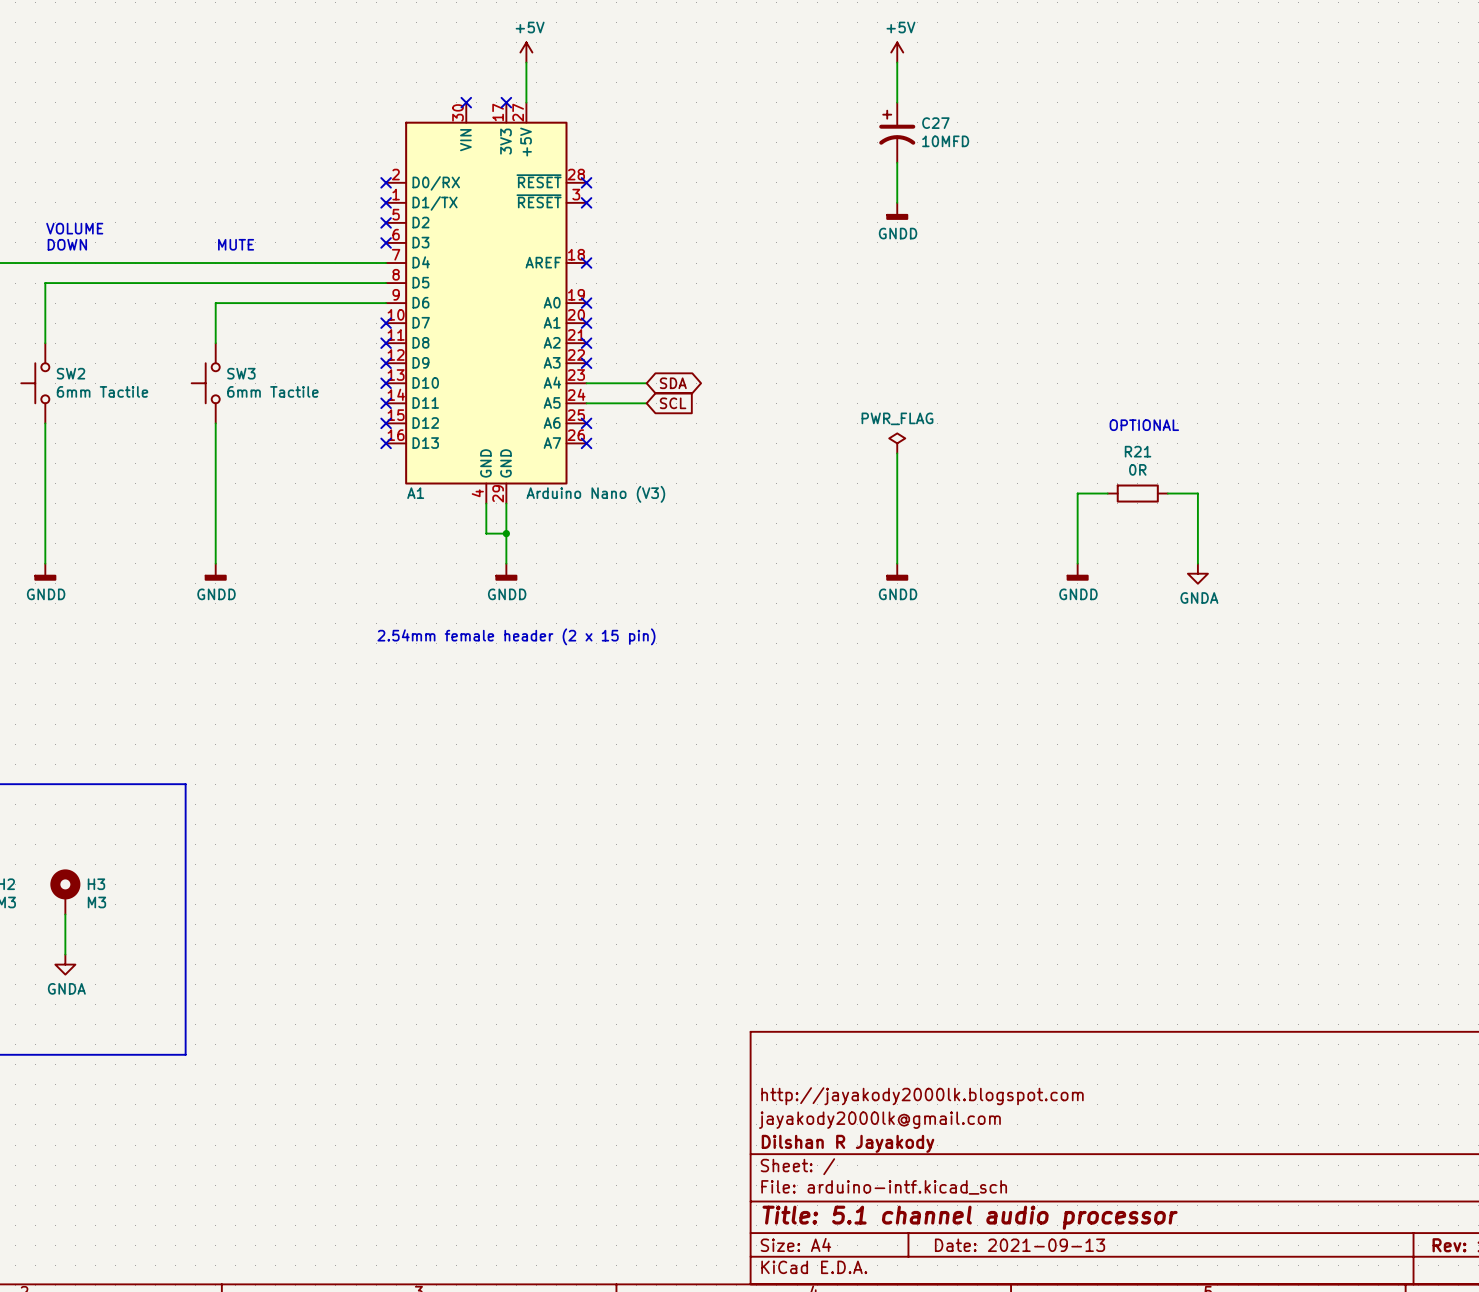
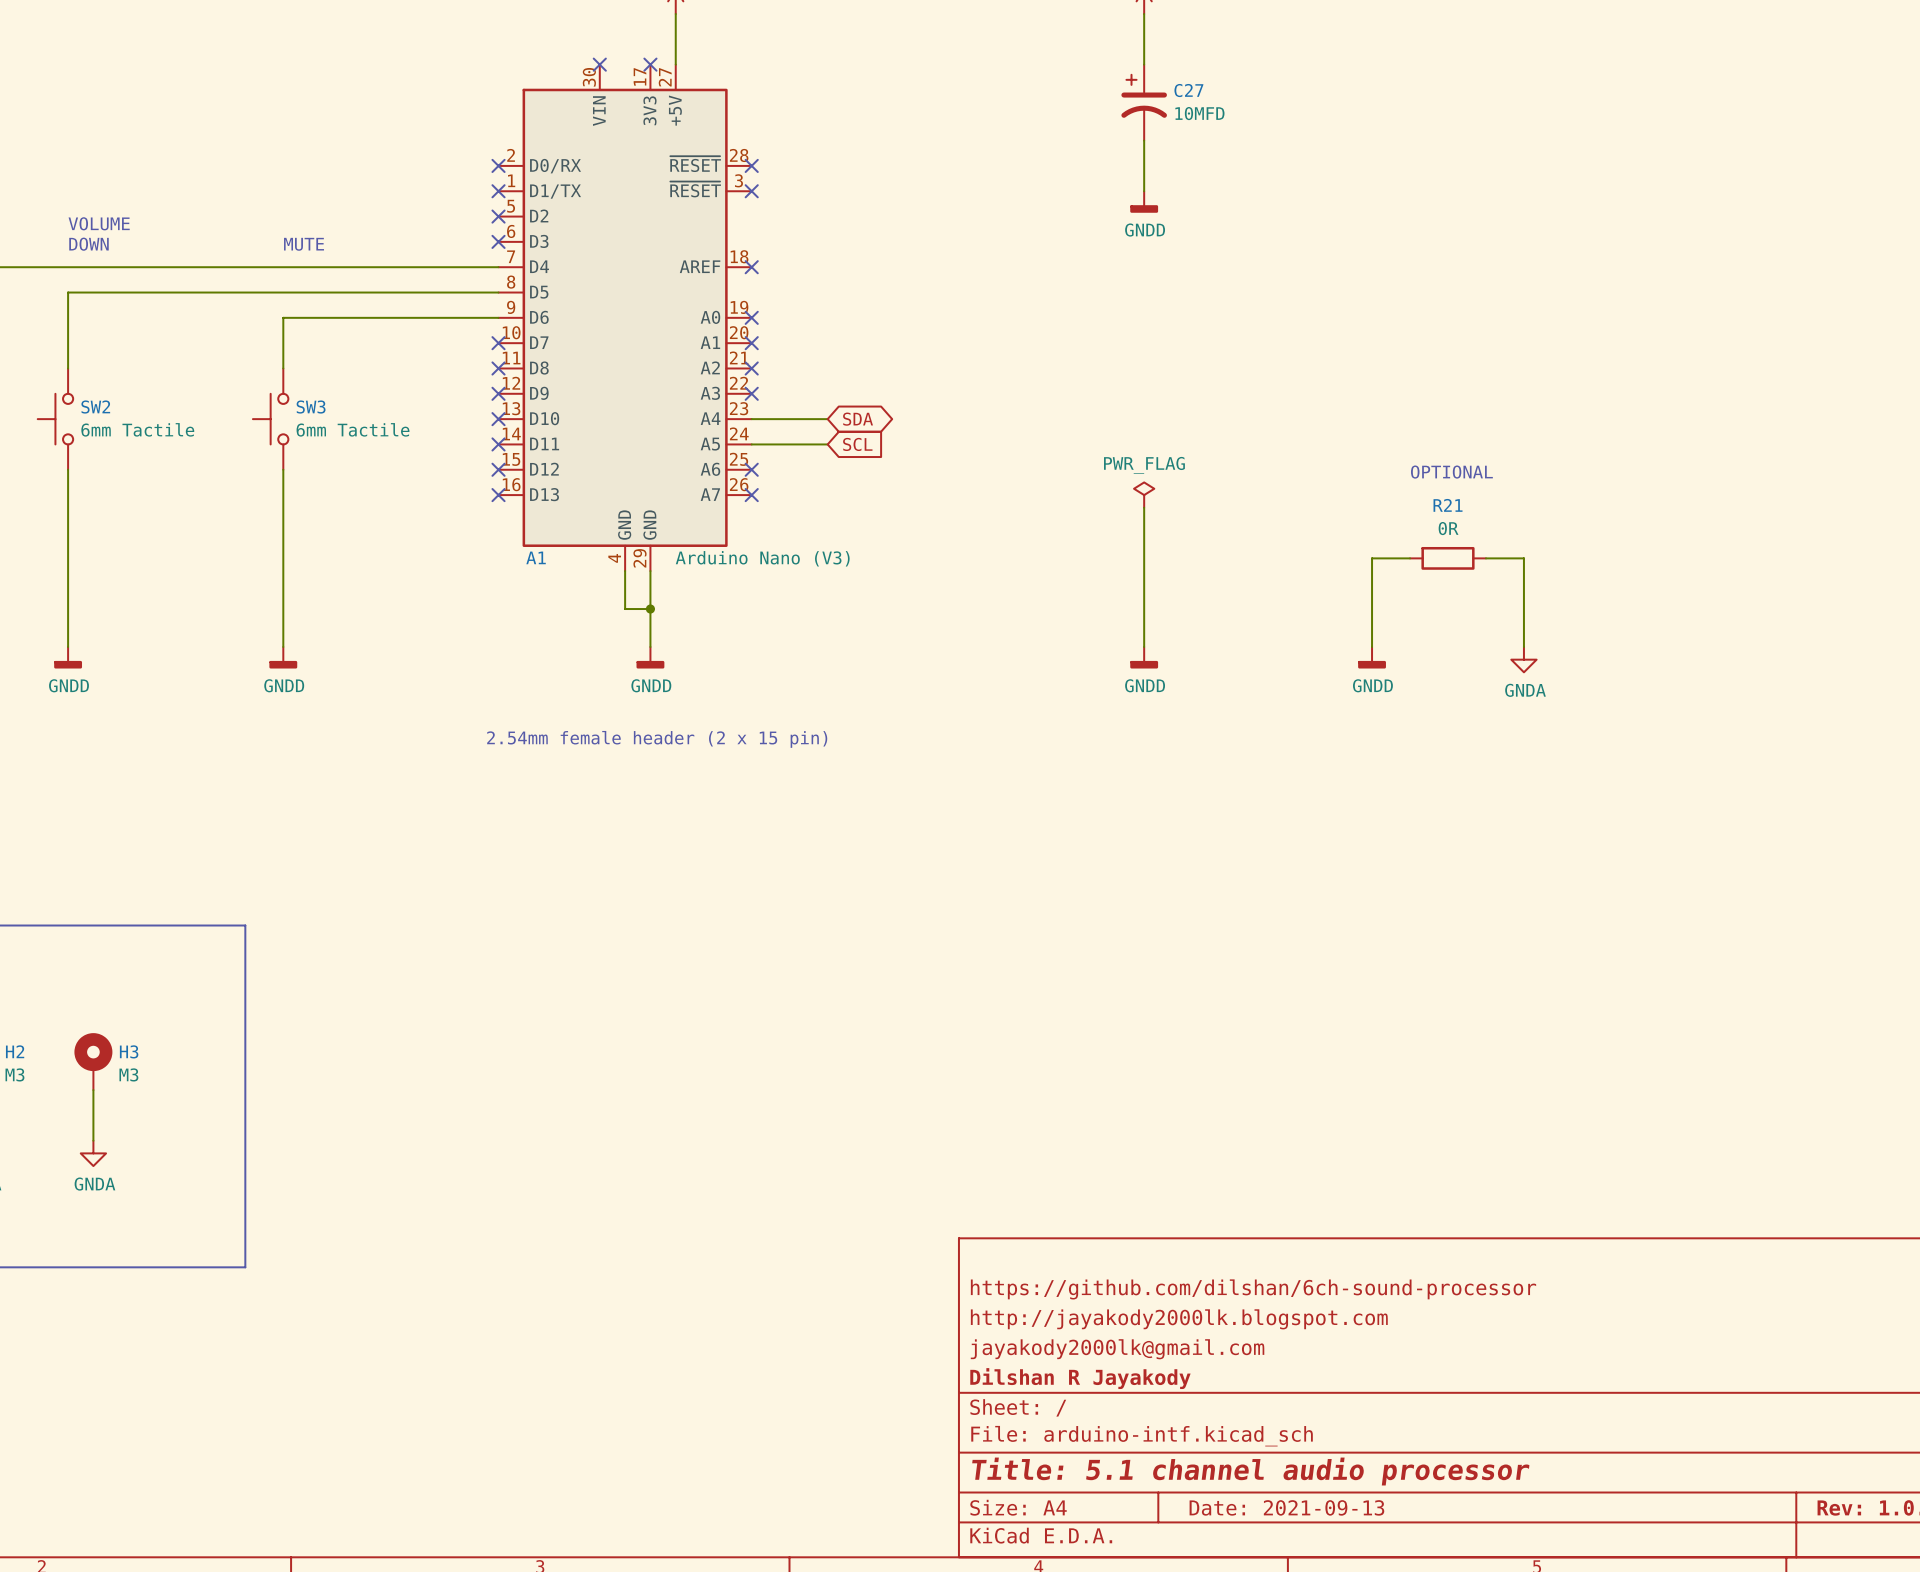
title block: none -> https://github.com/dilshan/6ch-sound-processor (1253, 1289)

